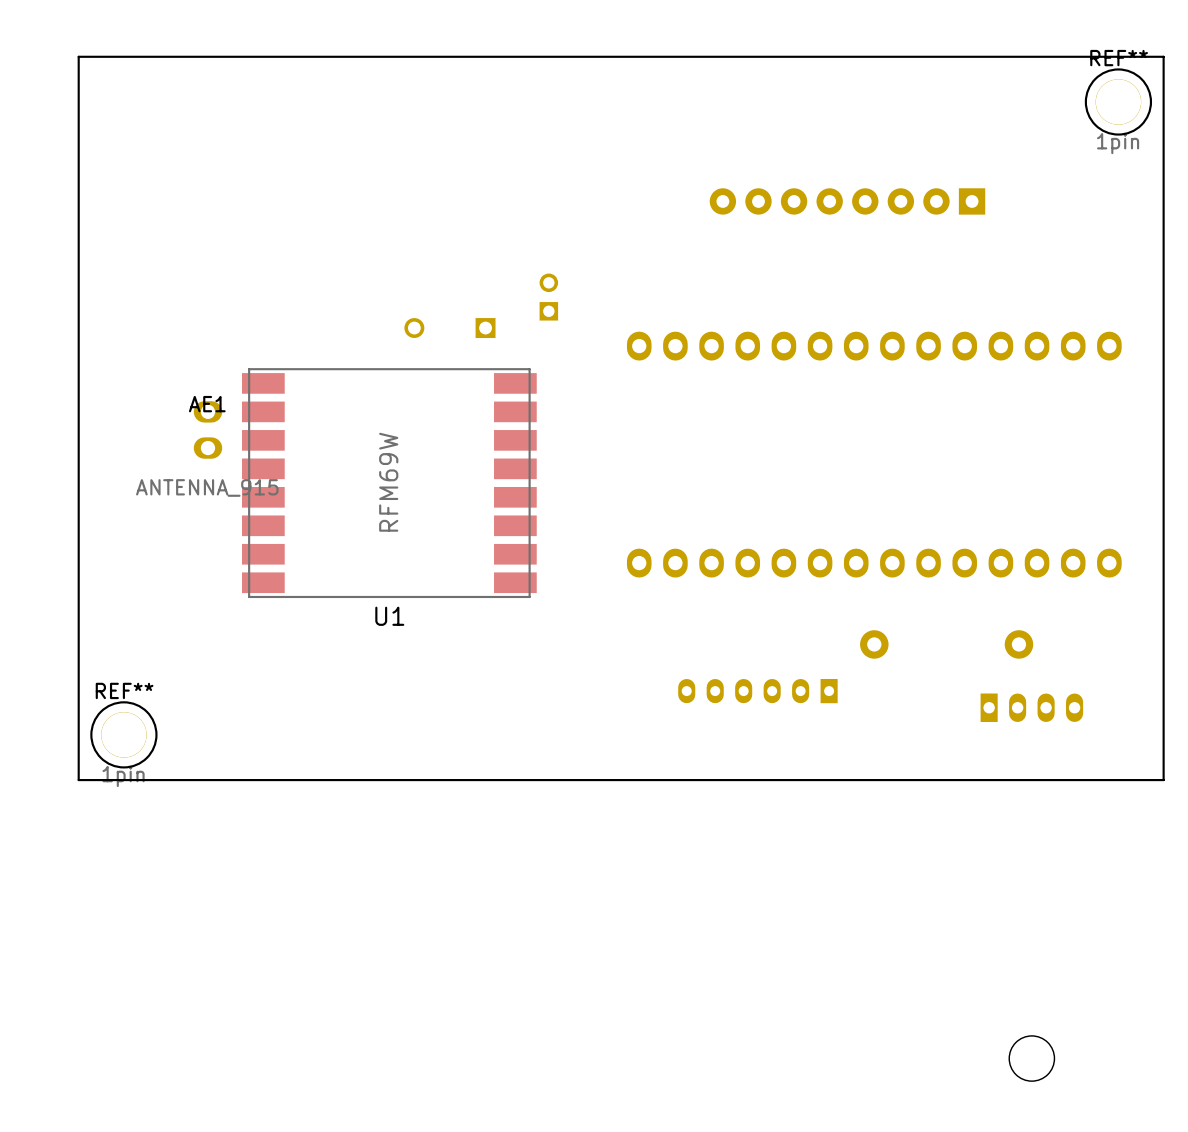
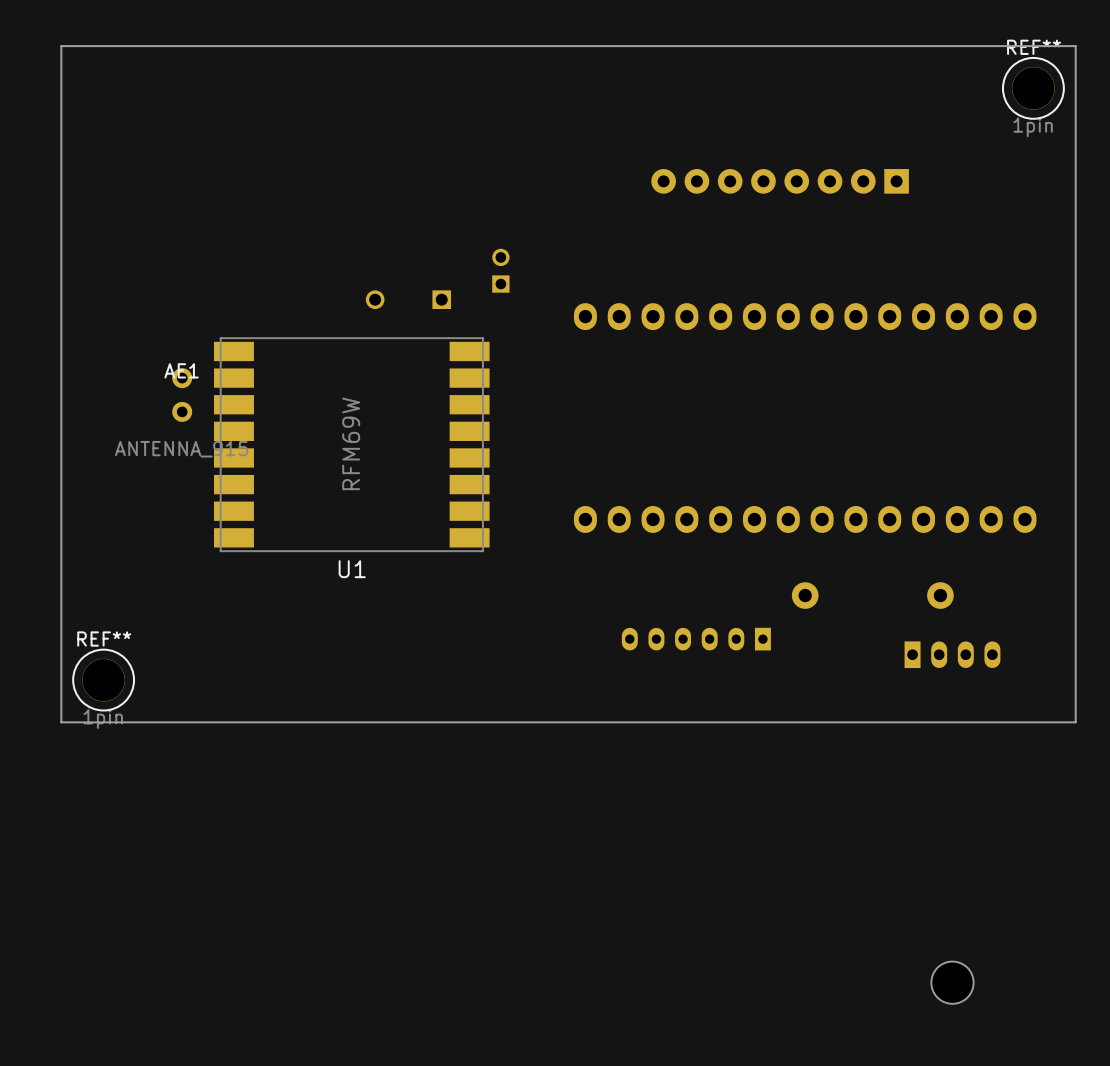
AE1 footprint: [193, 401, 223, 459] -> [172, 368, 193, 422]

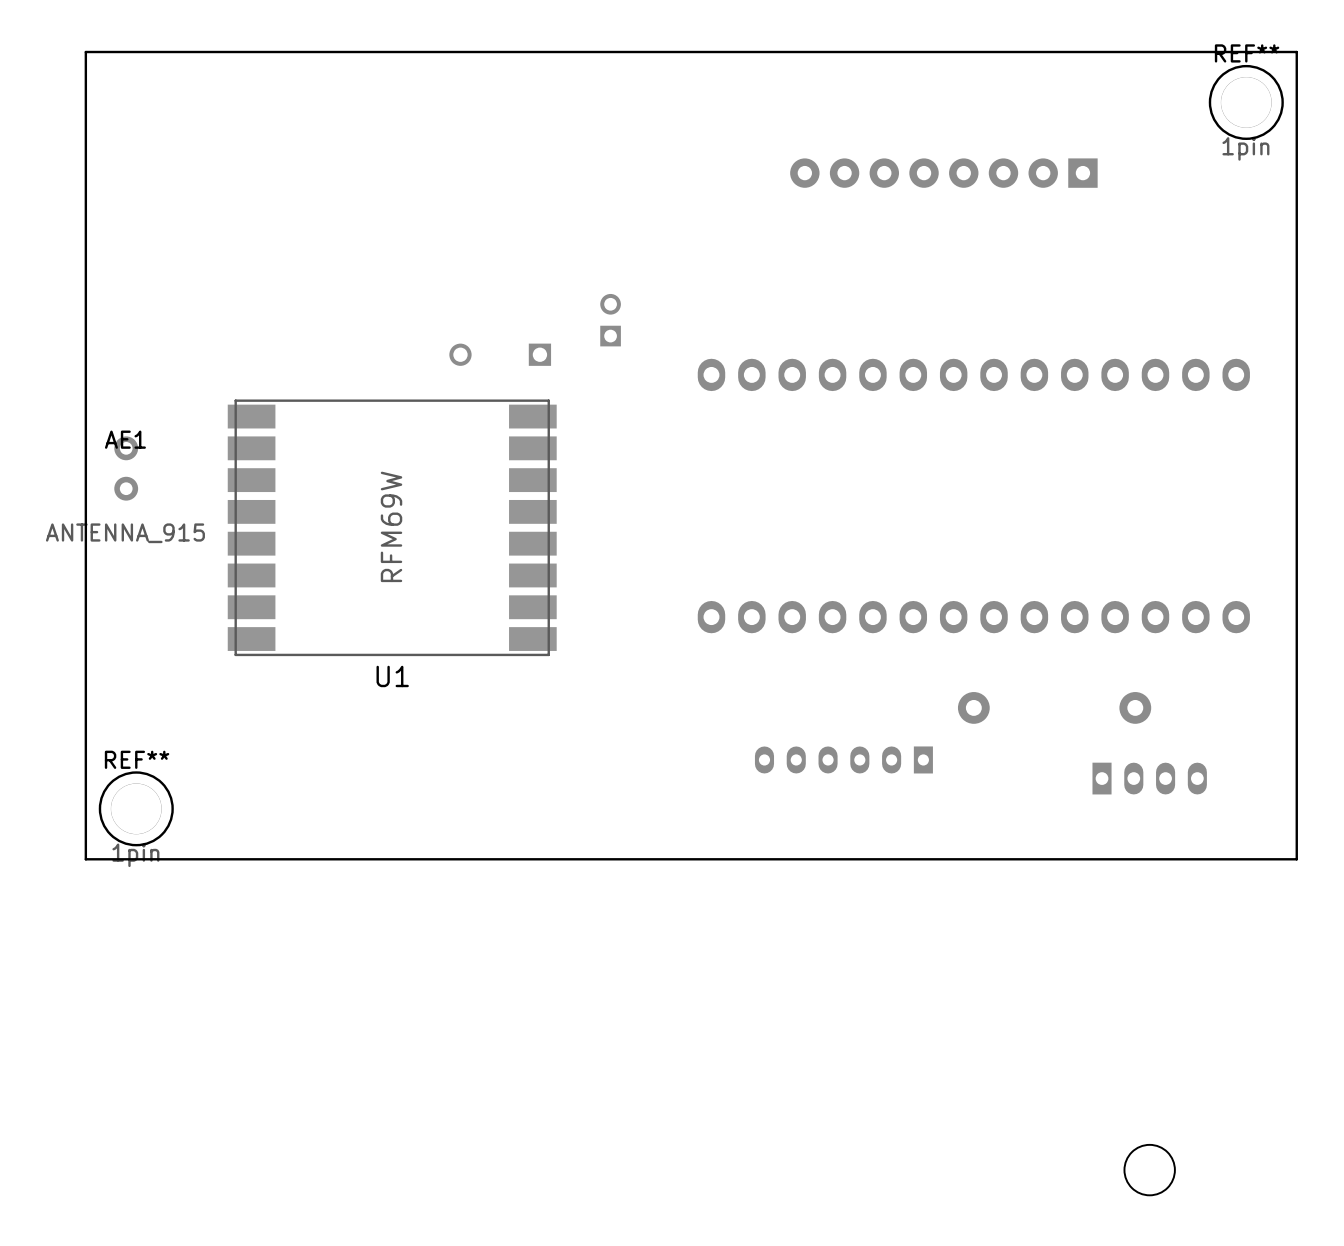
part position: (780, 181) -> (943, 173)
U1 footprint: [214, 337, 490, 553] -> [227, 399, 557, 657]
AE1 position: (182, 395) -> (126, 468)

